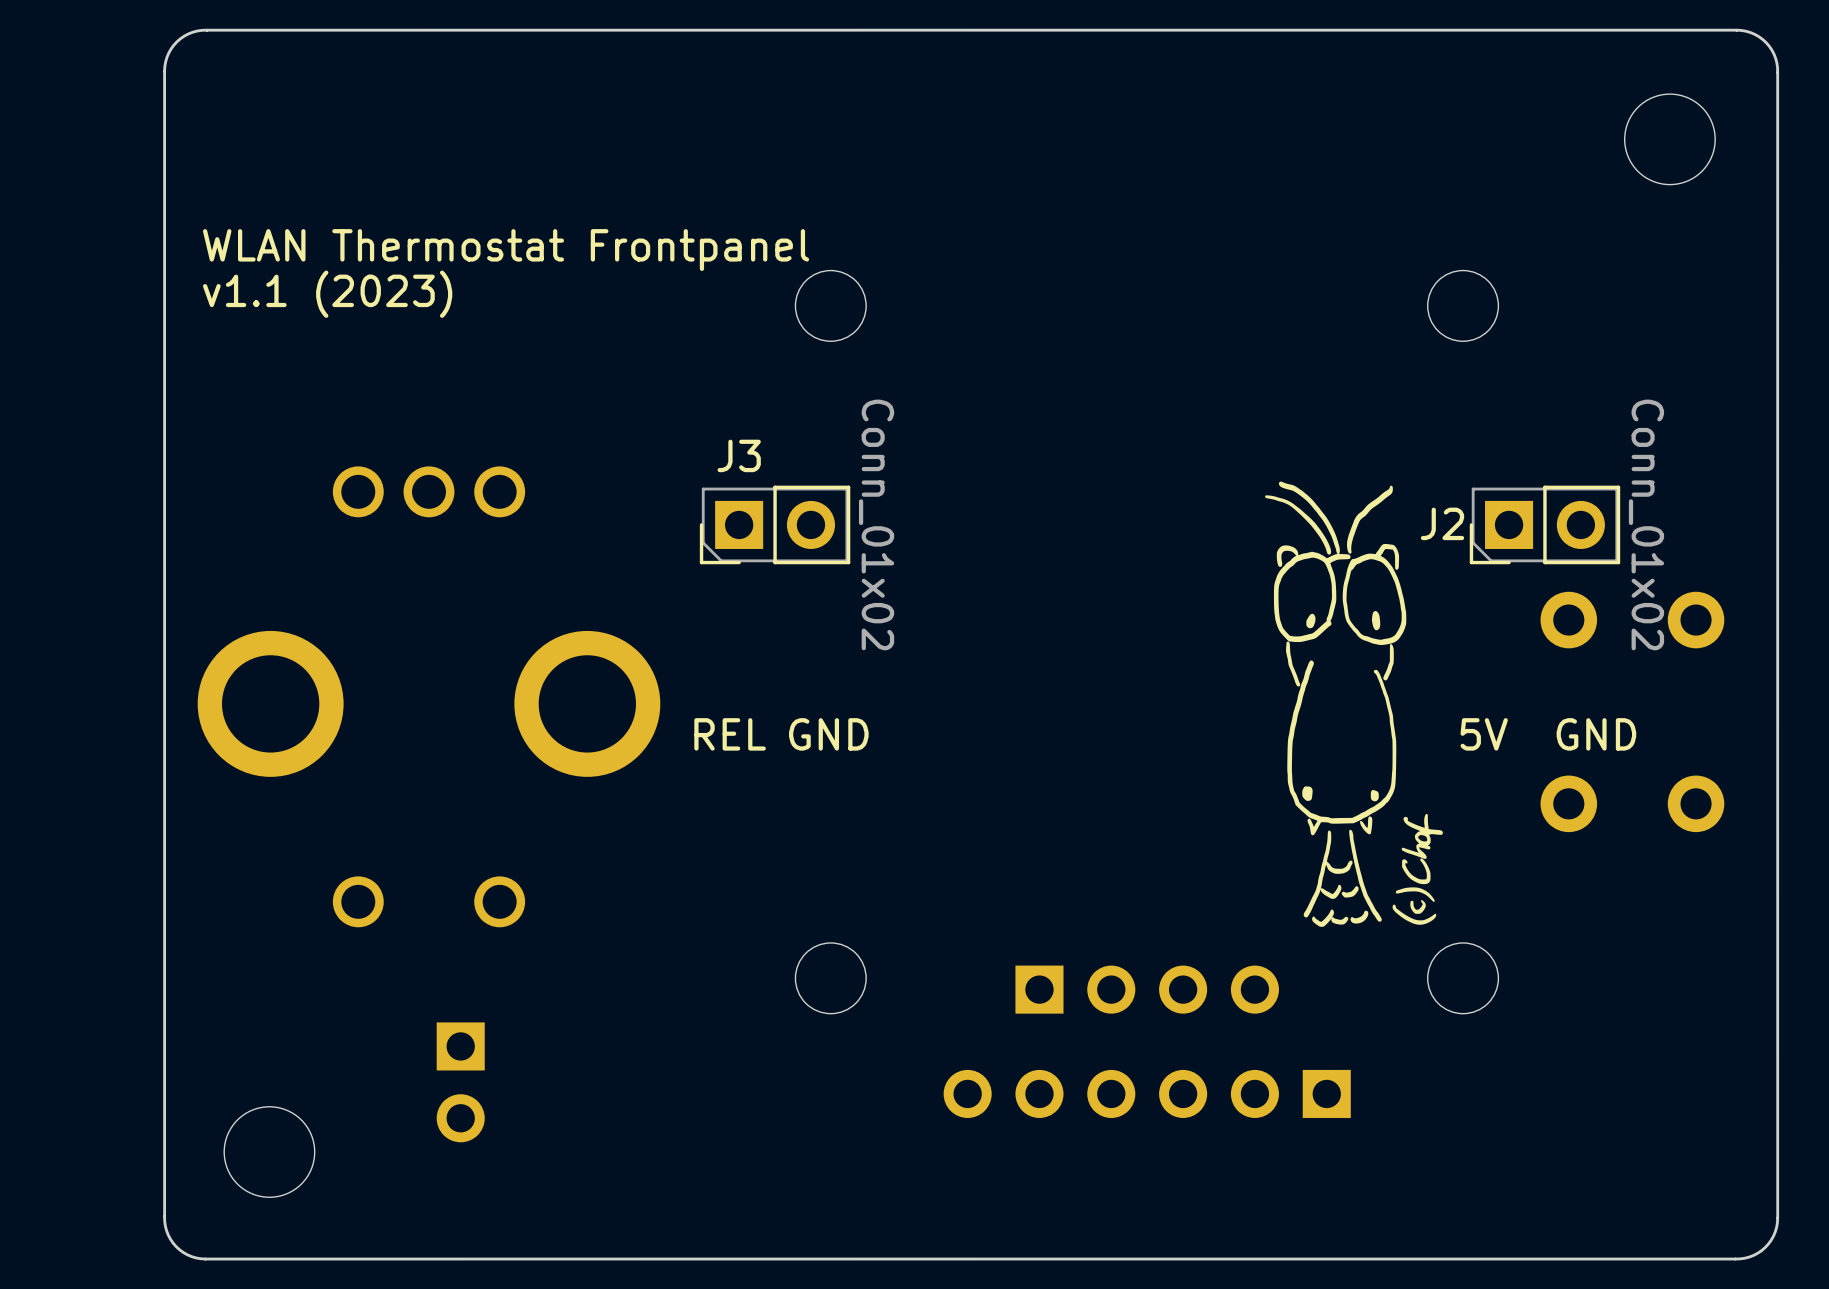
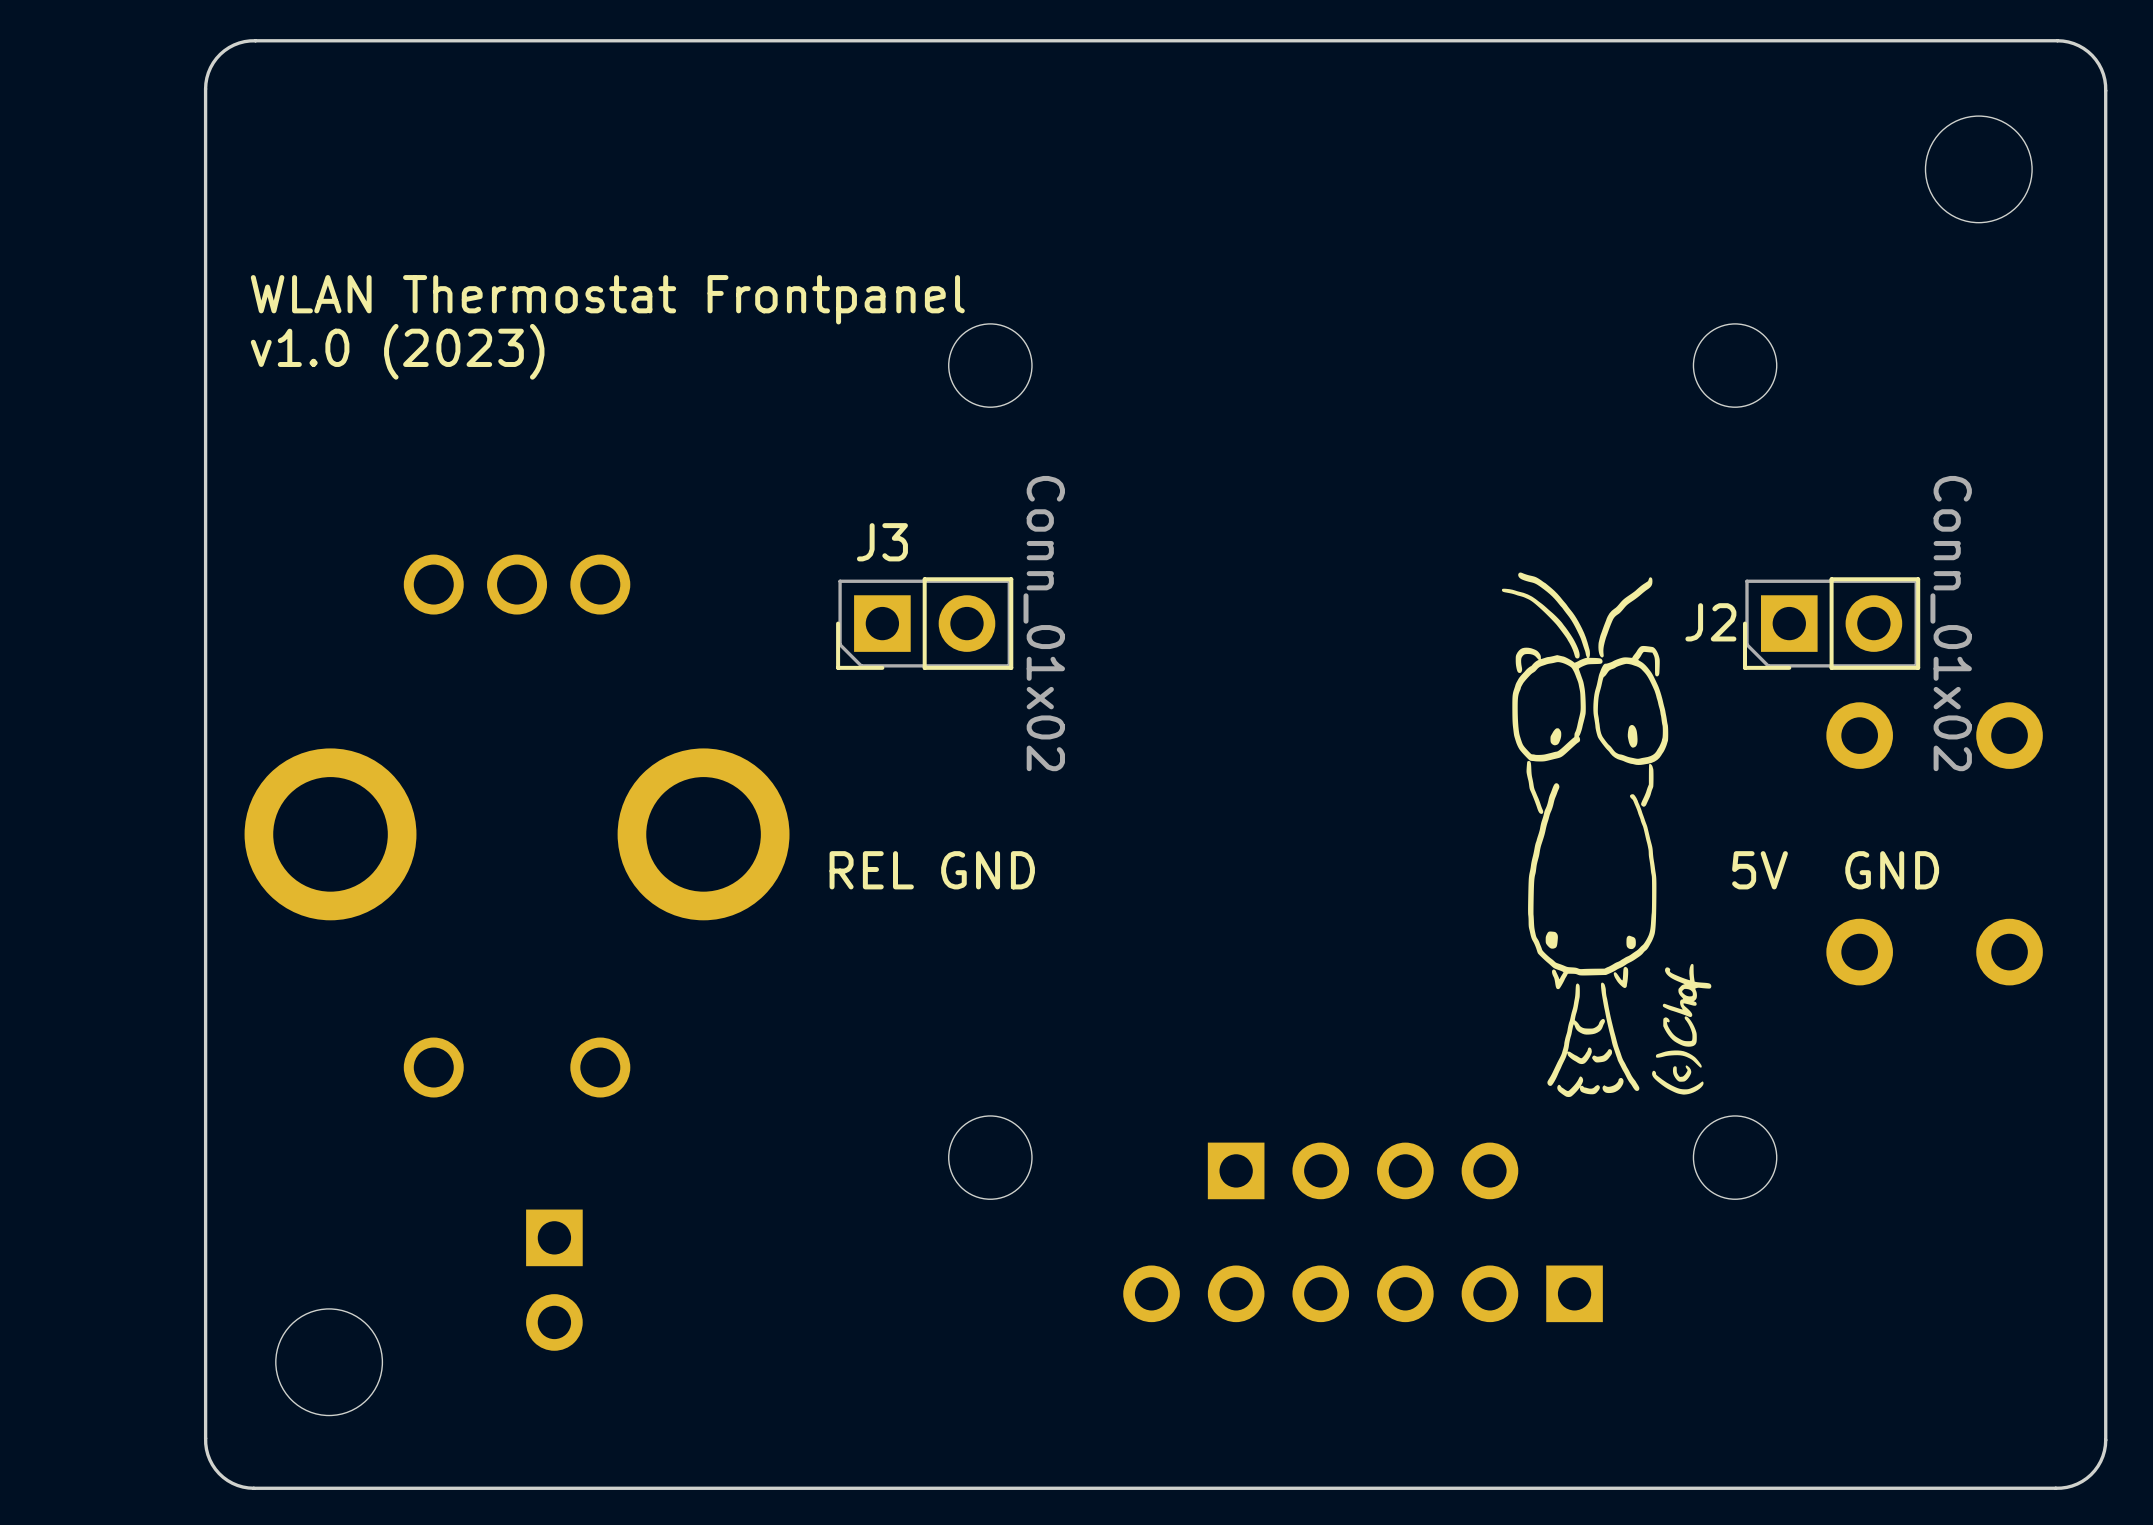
text: v1.1 (2023) (327, 294) -> v1.0 (2023) (397, 351)

